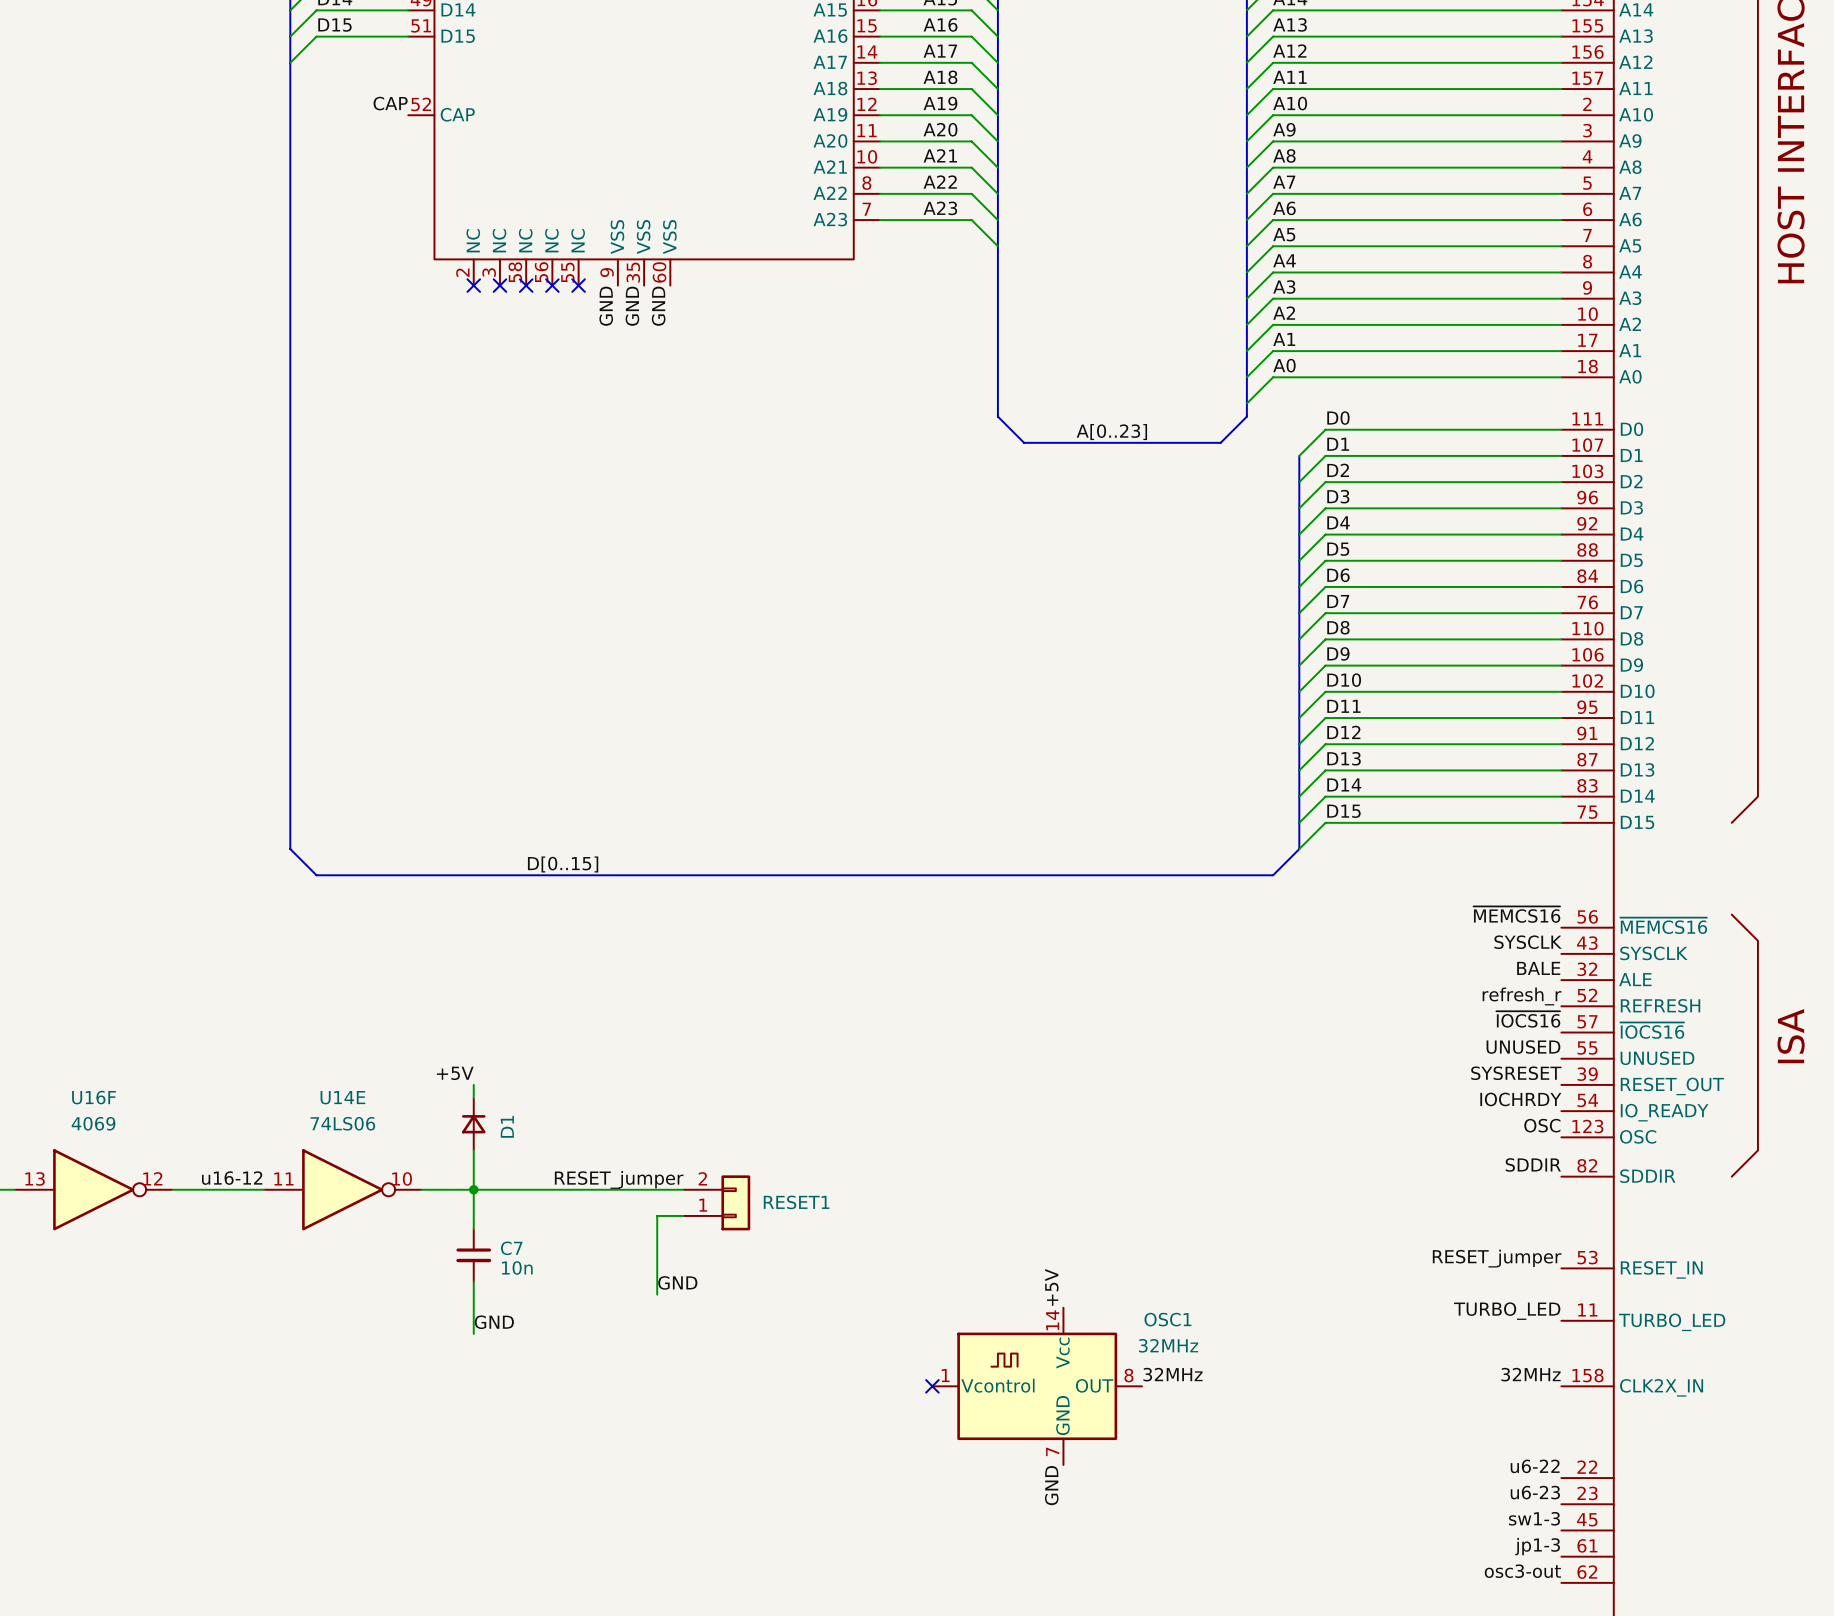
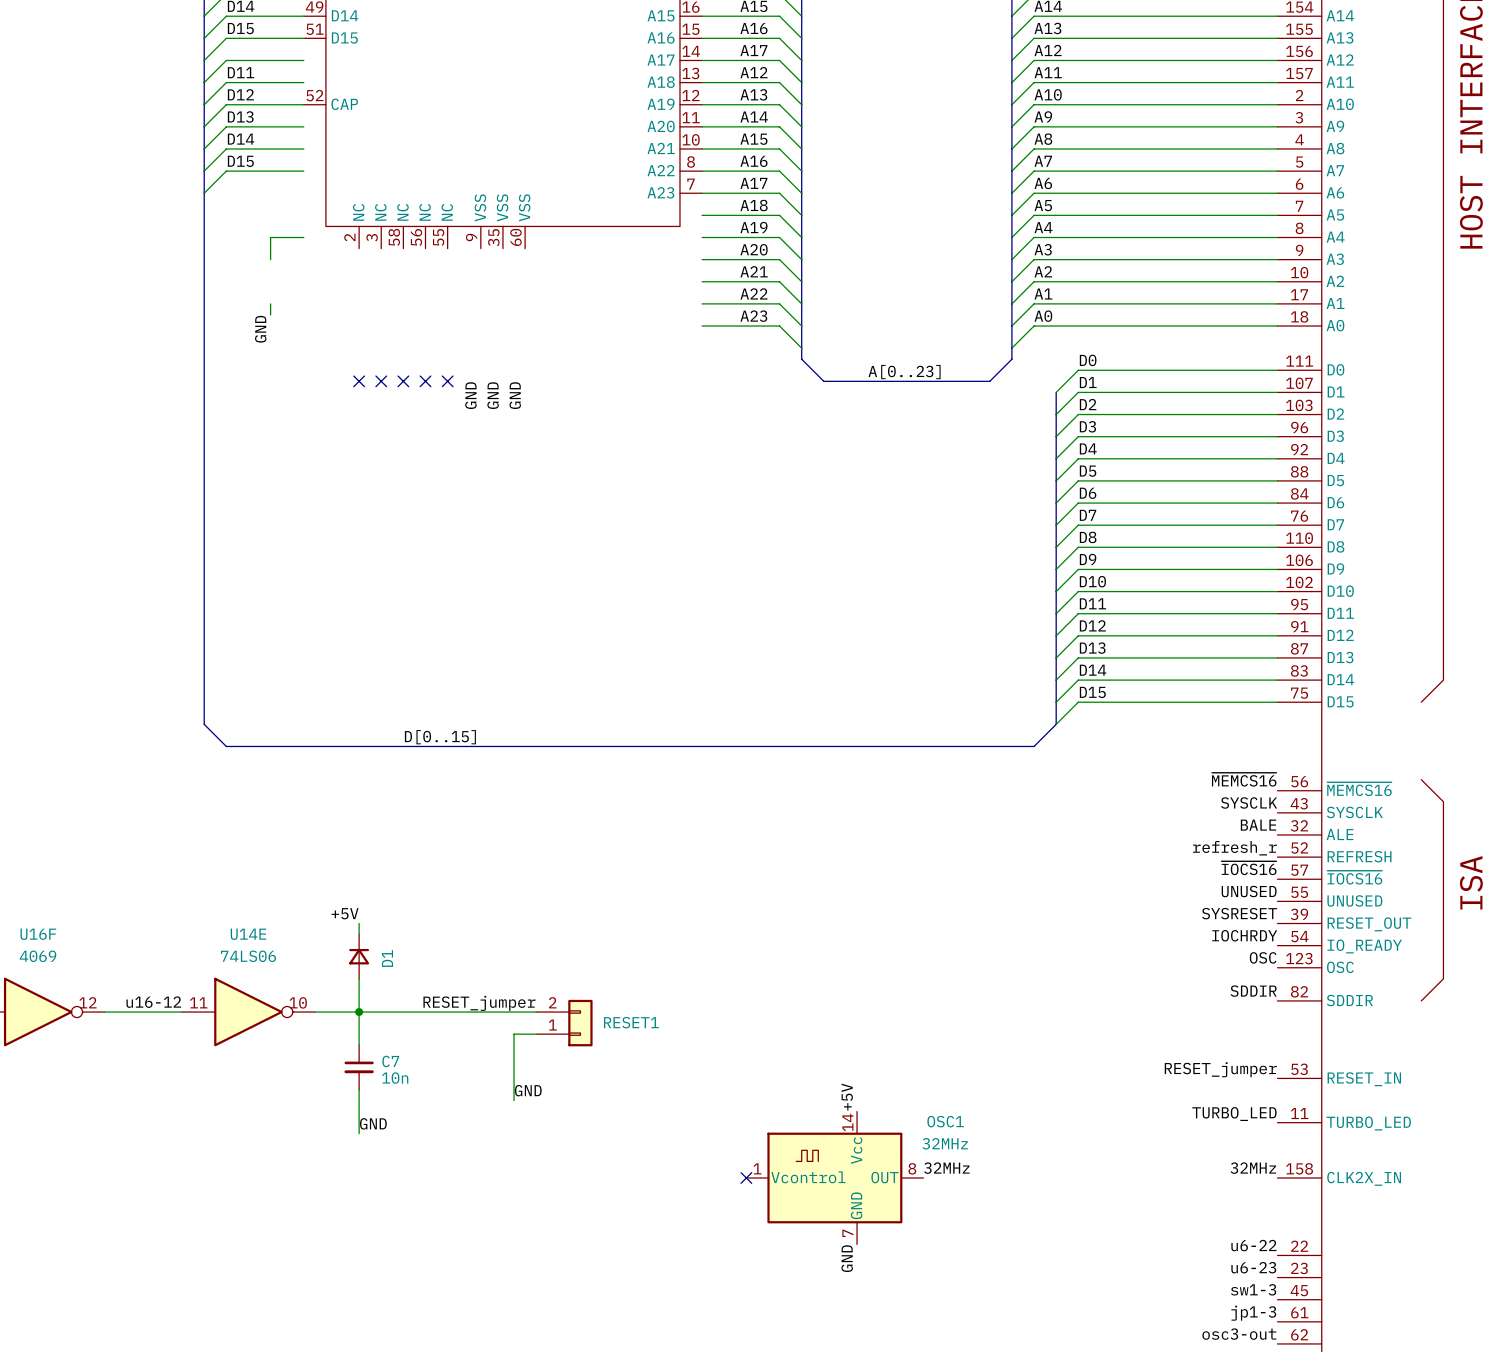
wire: none -> (303, 60) (226, 60) (204, 82)
label: none -> D11 (240, 72)
label: A18 (940, 77) -> A12 (753, 72)
wire: none -> (303, 82) (226, 82) (204, 104)
label: none -> D12 (240, 94)
label: CAP (390, 103) -> none
label: A19 (940, 103) -> A13 (753, 94)
wire: none -> (303, 104) (226, 104) (204, 126)
label: none -> D13 (240, 116)
label: A20 (940, 129) -> A14 (754, 116)
wire: none -> (303, 126) (226, 126) (204, 148)
label: none -> D14 (241, 139)
label: A21 (940, 155) -> A15 (753, 139)
wire: none -> (303, 148) (226, 148) (204, 171)
label: none -> D15 (240, 161)
label: A22 (940, 182) -> A16 (753, 161)
wire: none -> (303, 171) (226, 171) (204, 193)
label: A23 (940, 208) -> A17 (753, 183)
label: none -> A18 (754, 205)
wire: none -> (702, 215) (779, 215) (801, 237)
label: none -> A19 (753, 227)
wire: none -> (303, 237) (270, 237) (270, 259)
wire: none -> (702, 237) (779, 237) (801, 259)
no-connect mark: (473, 285) -> none
no-connect mark: (499, 285) -> none
no-connect mark: (526, 285) -> none
no-connect mark: (552, 285) -> none
no-connect mark: (578, 285) -> none
label: none -> A20 (754, 249)
wire: none -> (702, 259) (779, 259) (801, 281)
label: GND (606, 306) -> none
label: GND (632, 306) -> none
label: GND (658, 306) -> none
label: none -> A21 (754, 271)
wire: none -> (702, 281) (779, 281) (801, 303)
label: none -> A22 (753, 293)
wire: none -> (270, 303) (270, 314)
wire: none -> (702, 303) (779, 303) (801, 326)
label: none -> A23 (753, 316)
wire: none -> (702, 326) (779, 326) (801, 348)
label: none -> GND (260, 329)
no-connect mark: none -> (359, 381)
no-connect mark: none -> (381, 381)
no-connect mark: none -> (403, 381)
no-connect mark: none -> (425, 381)
no-connect mark: none -> (447, 381)
label: none -> GND (470, 395)
label: none -> GND (493, 395)
label: none -> GND (515, 395)

